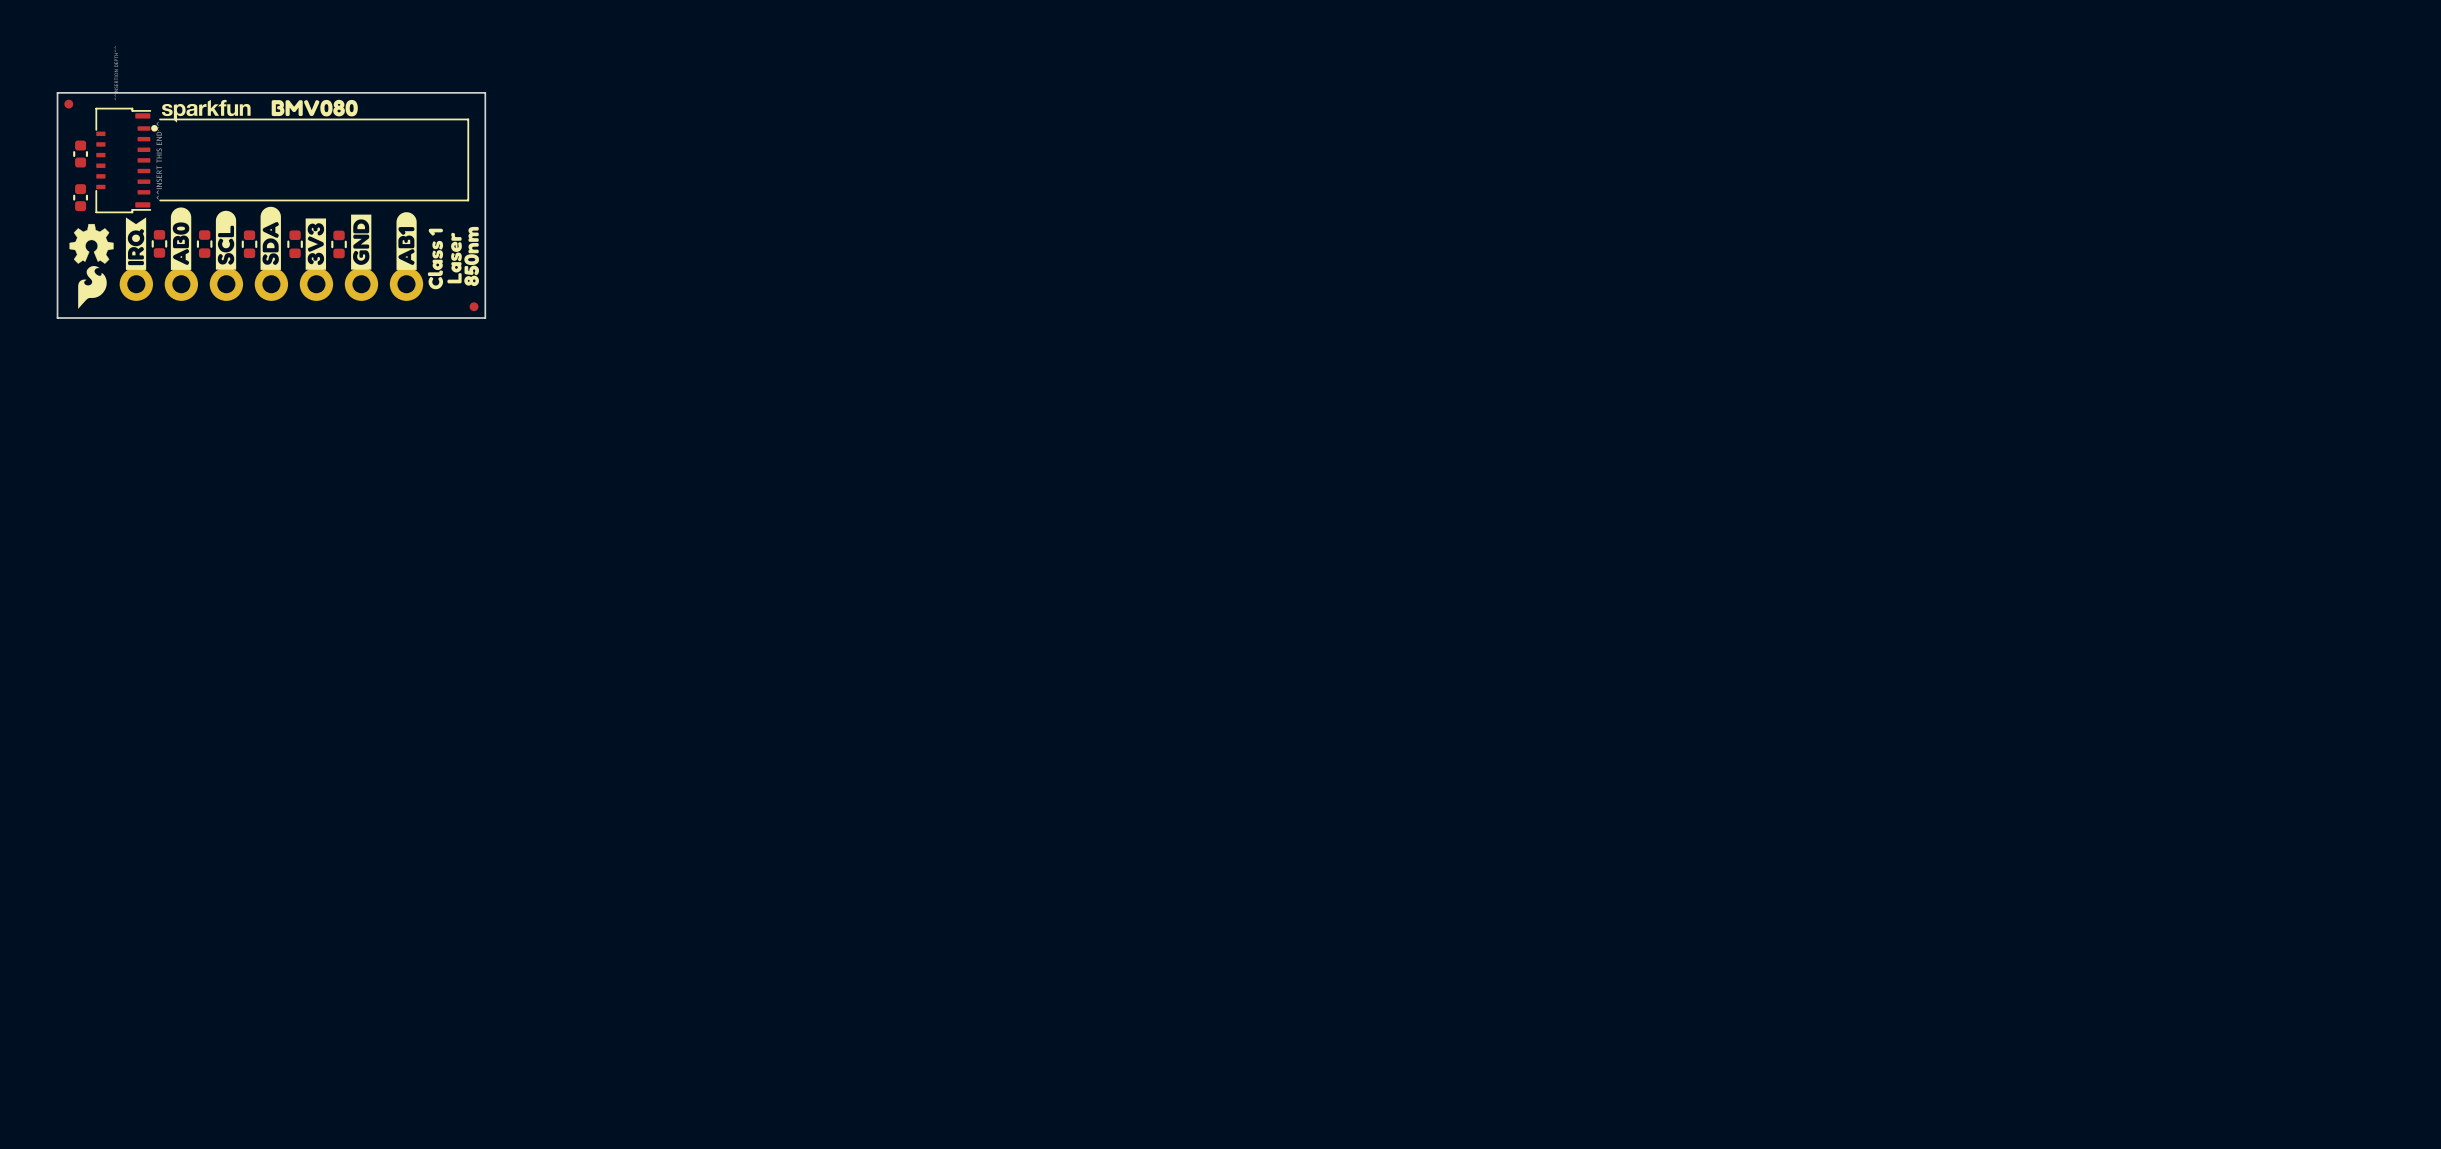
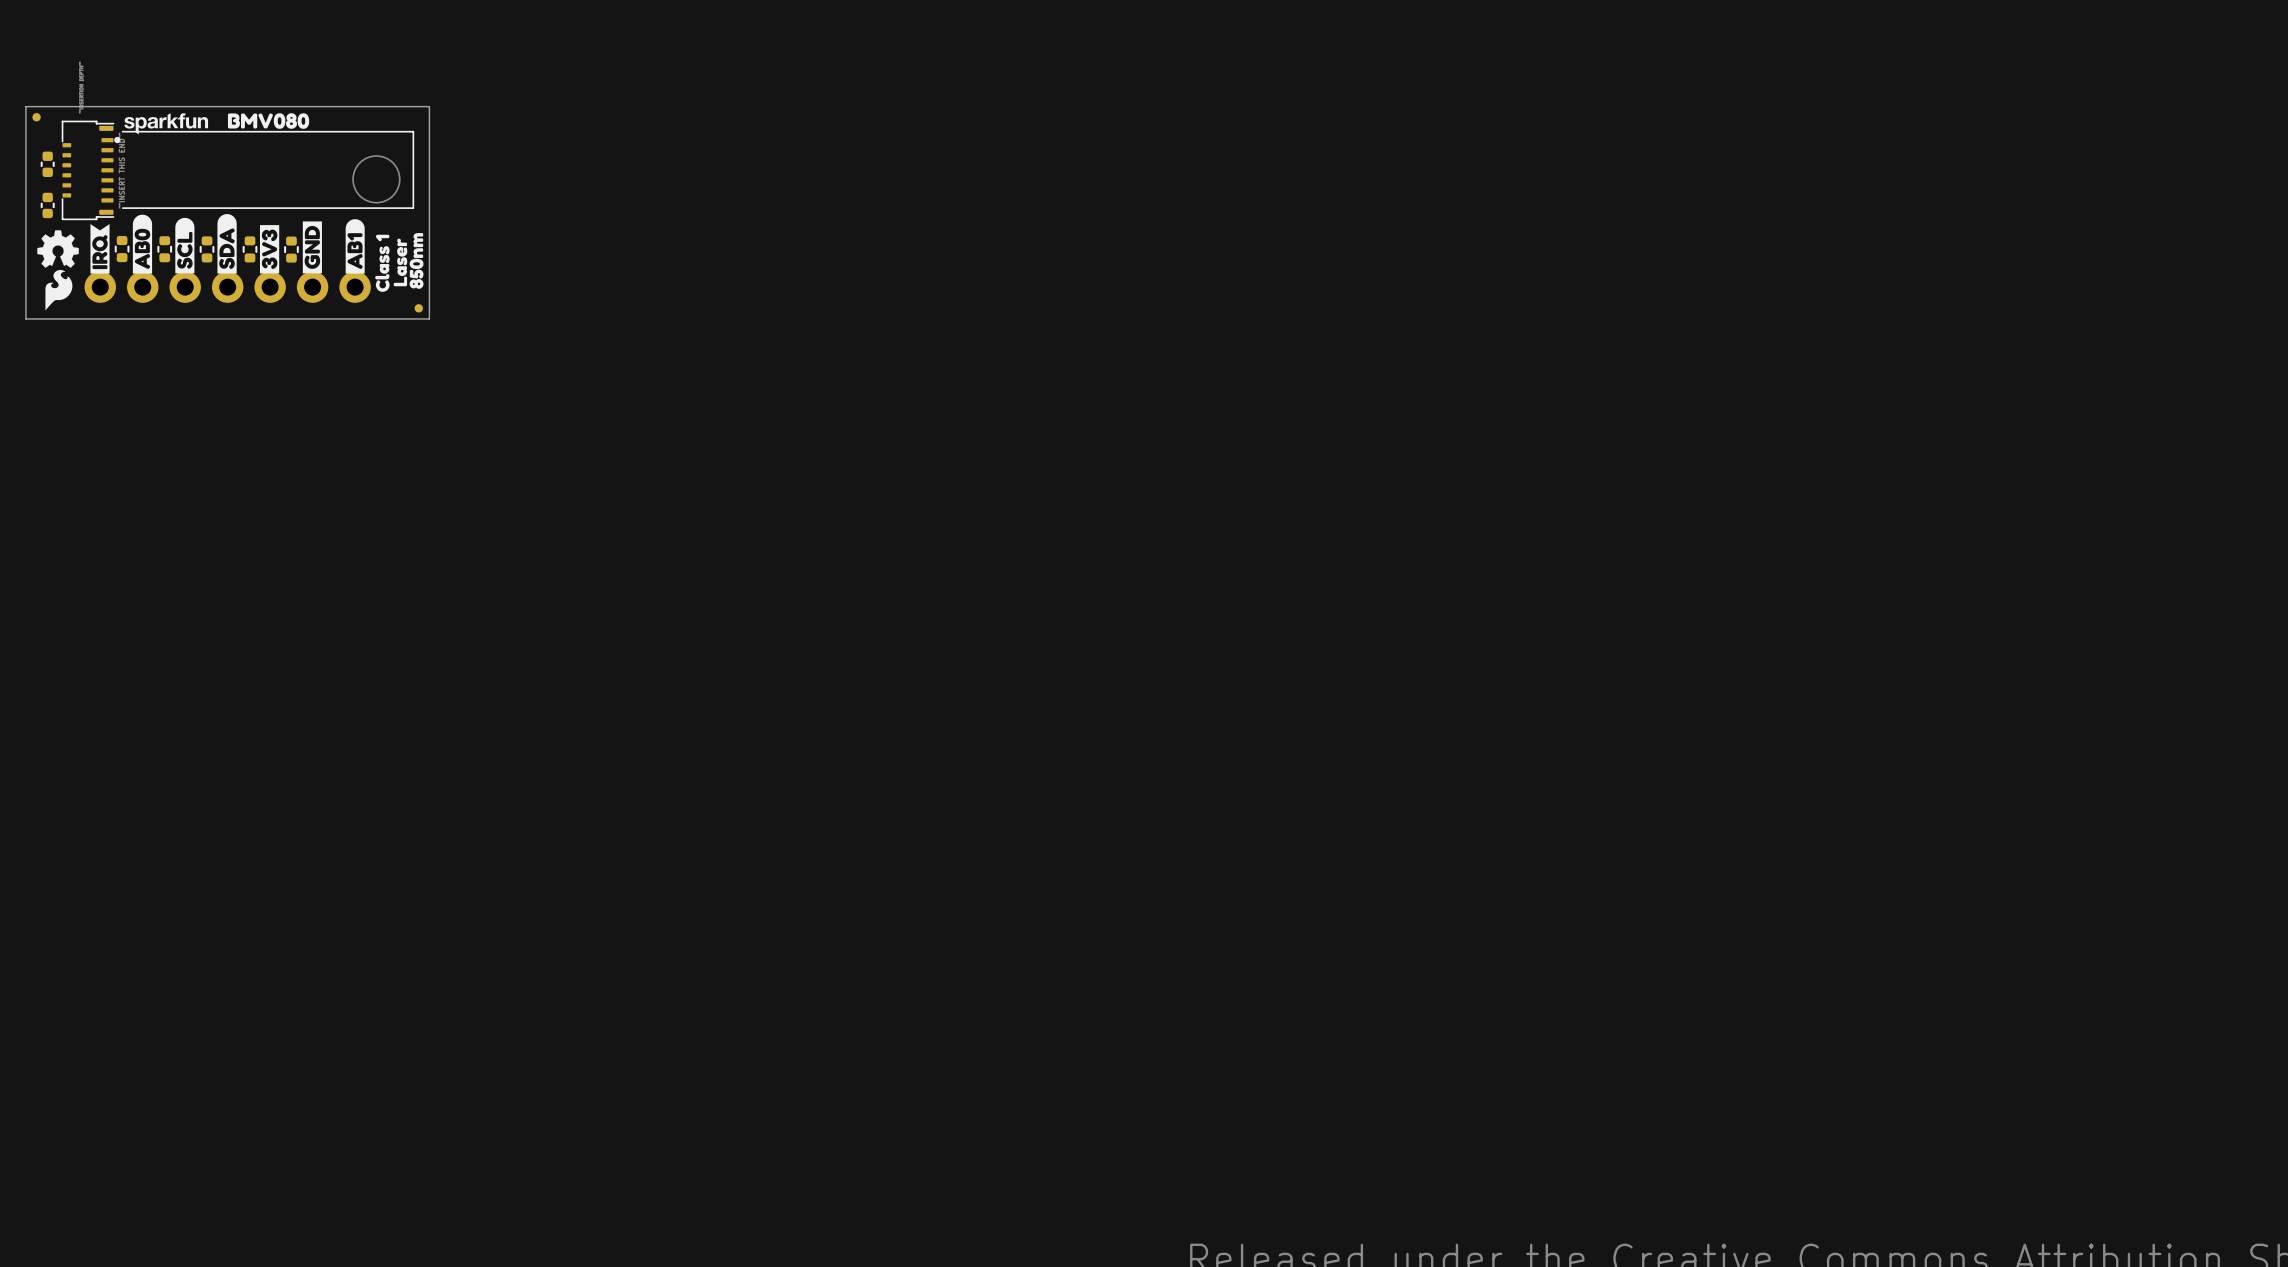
drawing: none -> [352, 155, 401, 204]

